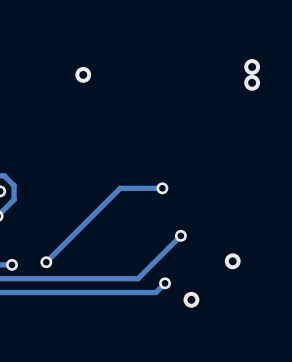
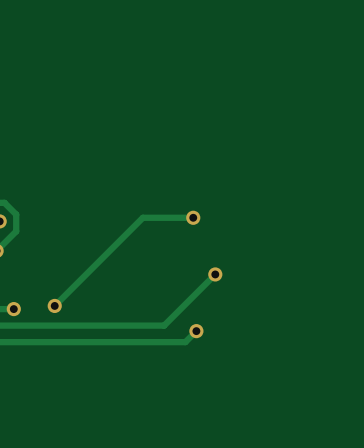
via: (252, 66) -> none
via: (83, 74) -> none
via: (252, 82) -> none
via: (232, 261) -> none
via: (191, 299) -> none

